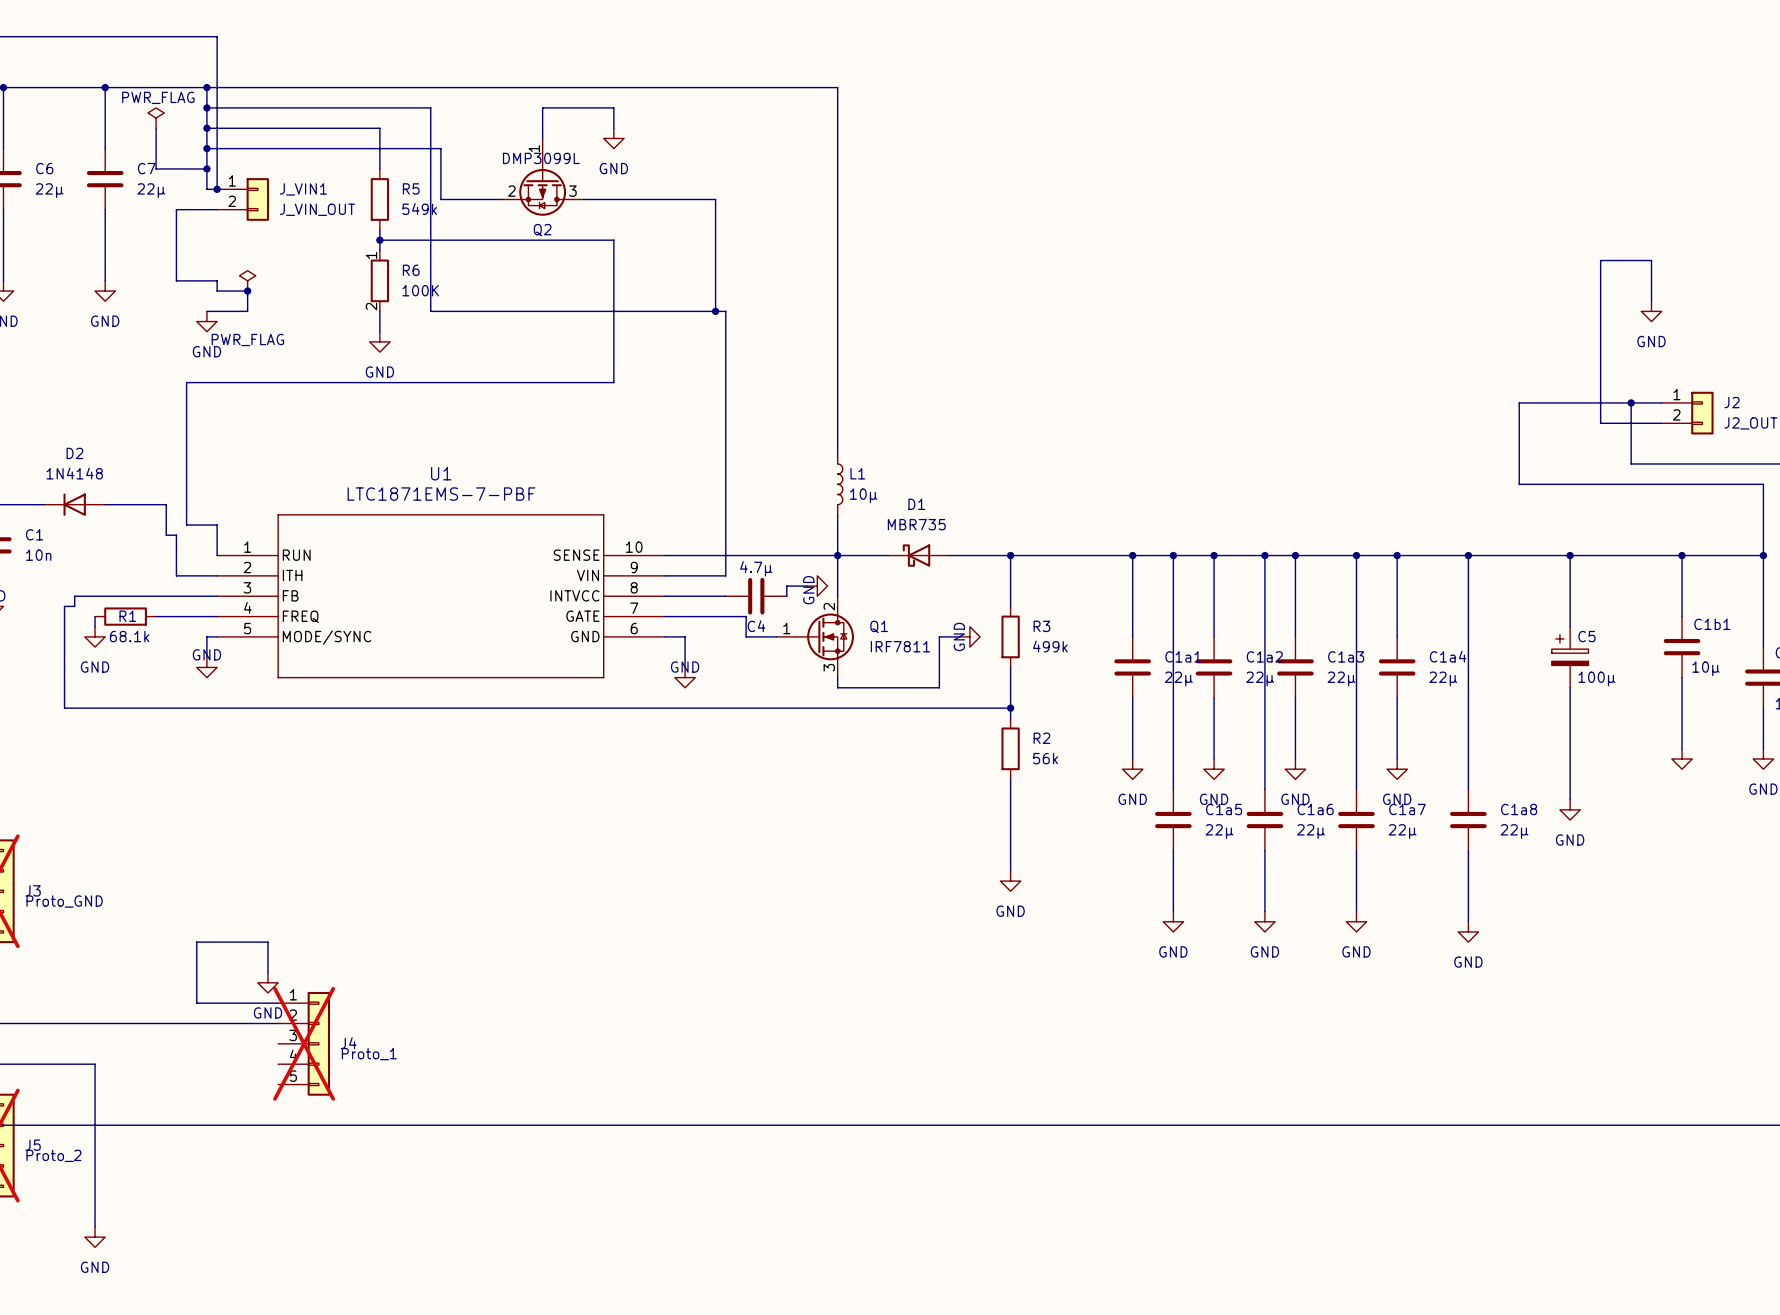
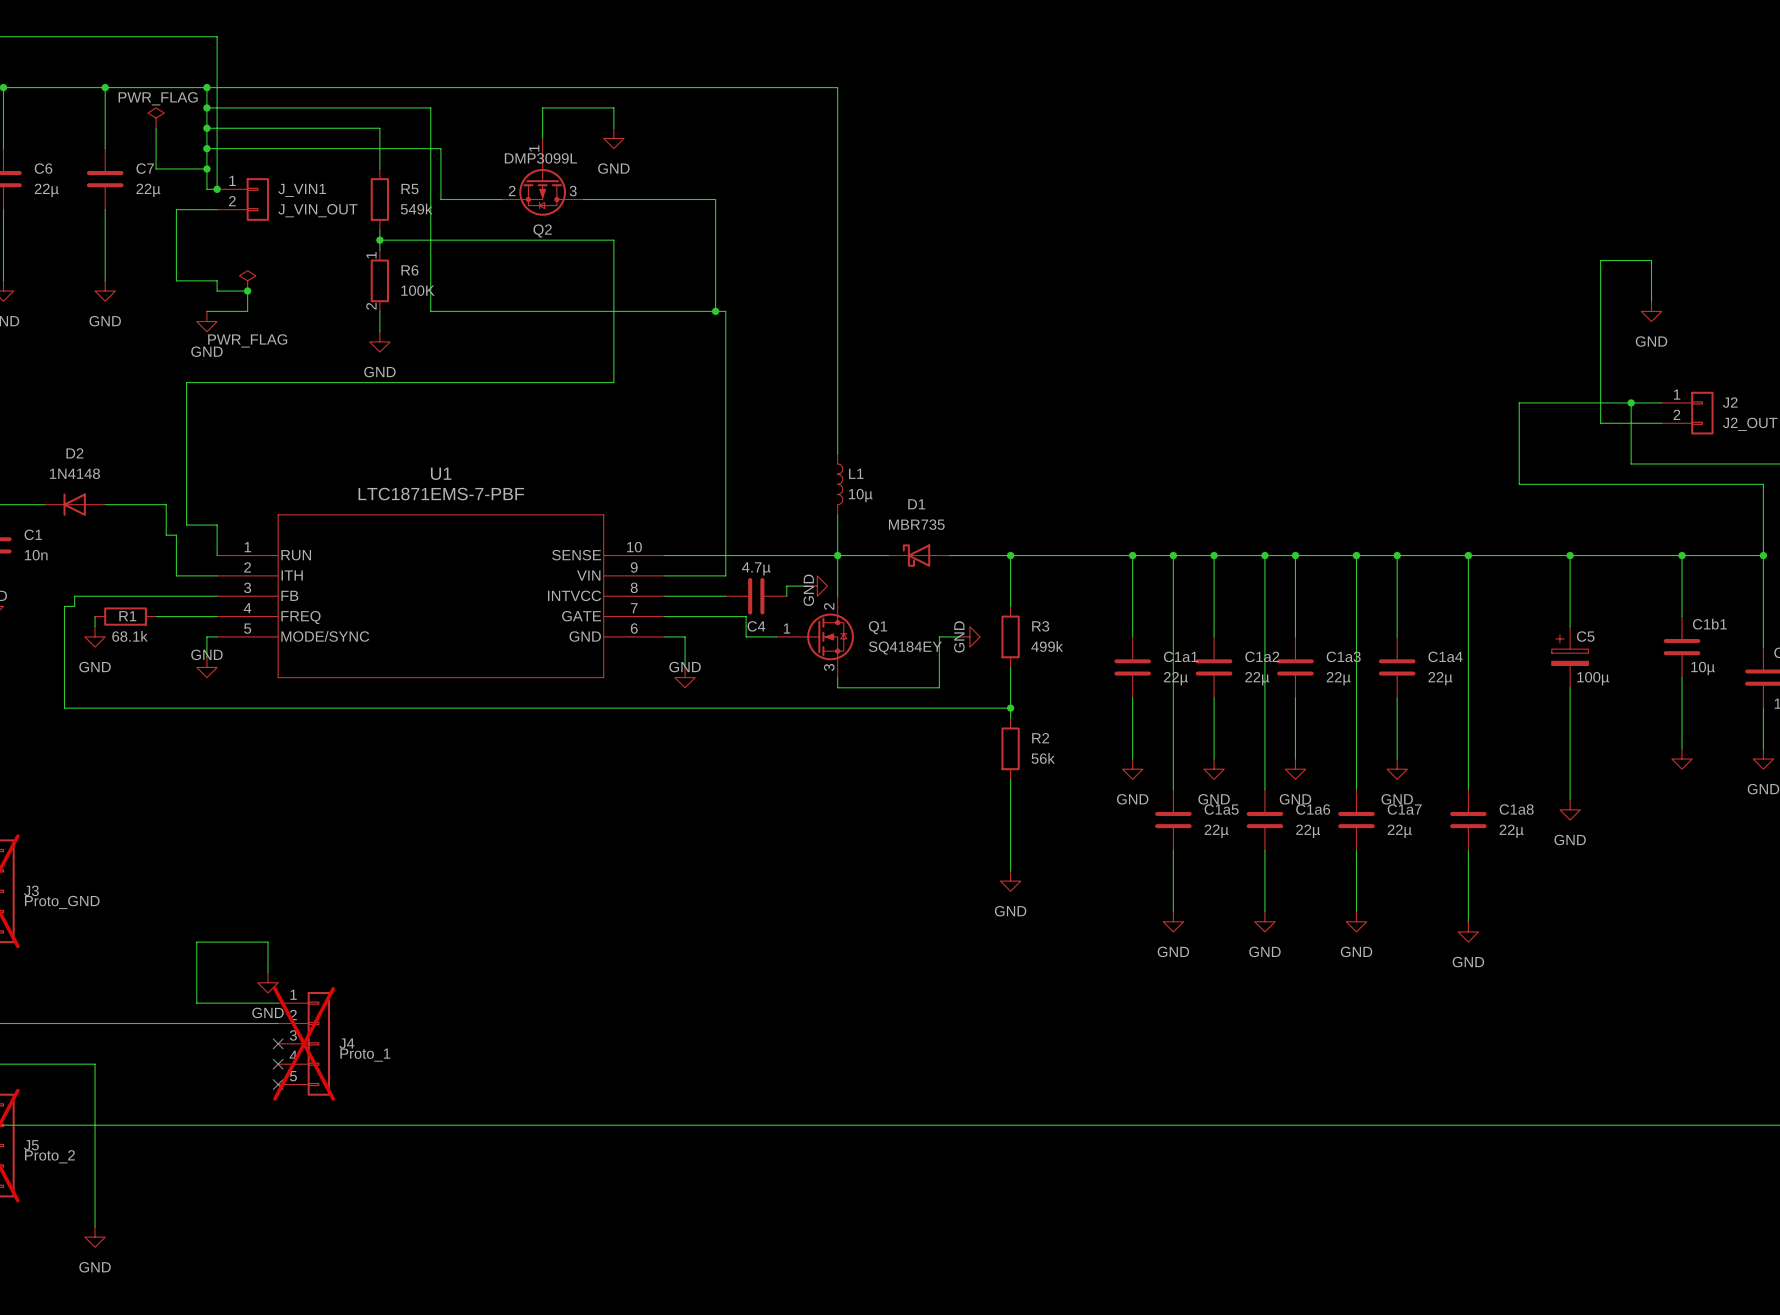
Q1 value: IRF7811 (900, 646) -> SQ4184EY (905, 648)
no-connect mark: none -> (278, 1043)
no-connect mark: none -> (278, 1064)
no-connect mark: none -> (278, 1084)

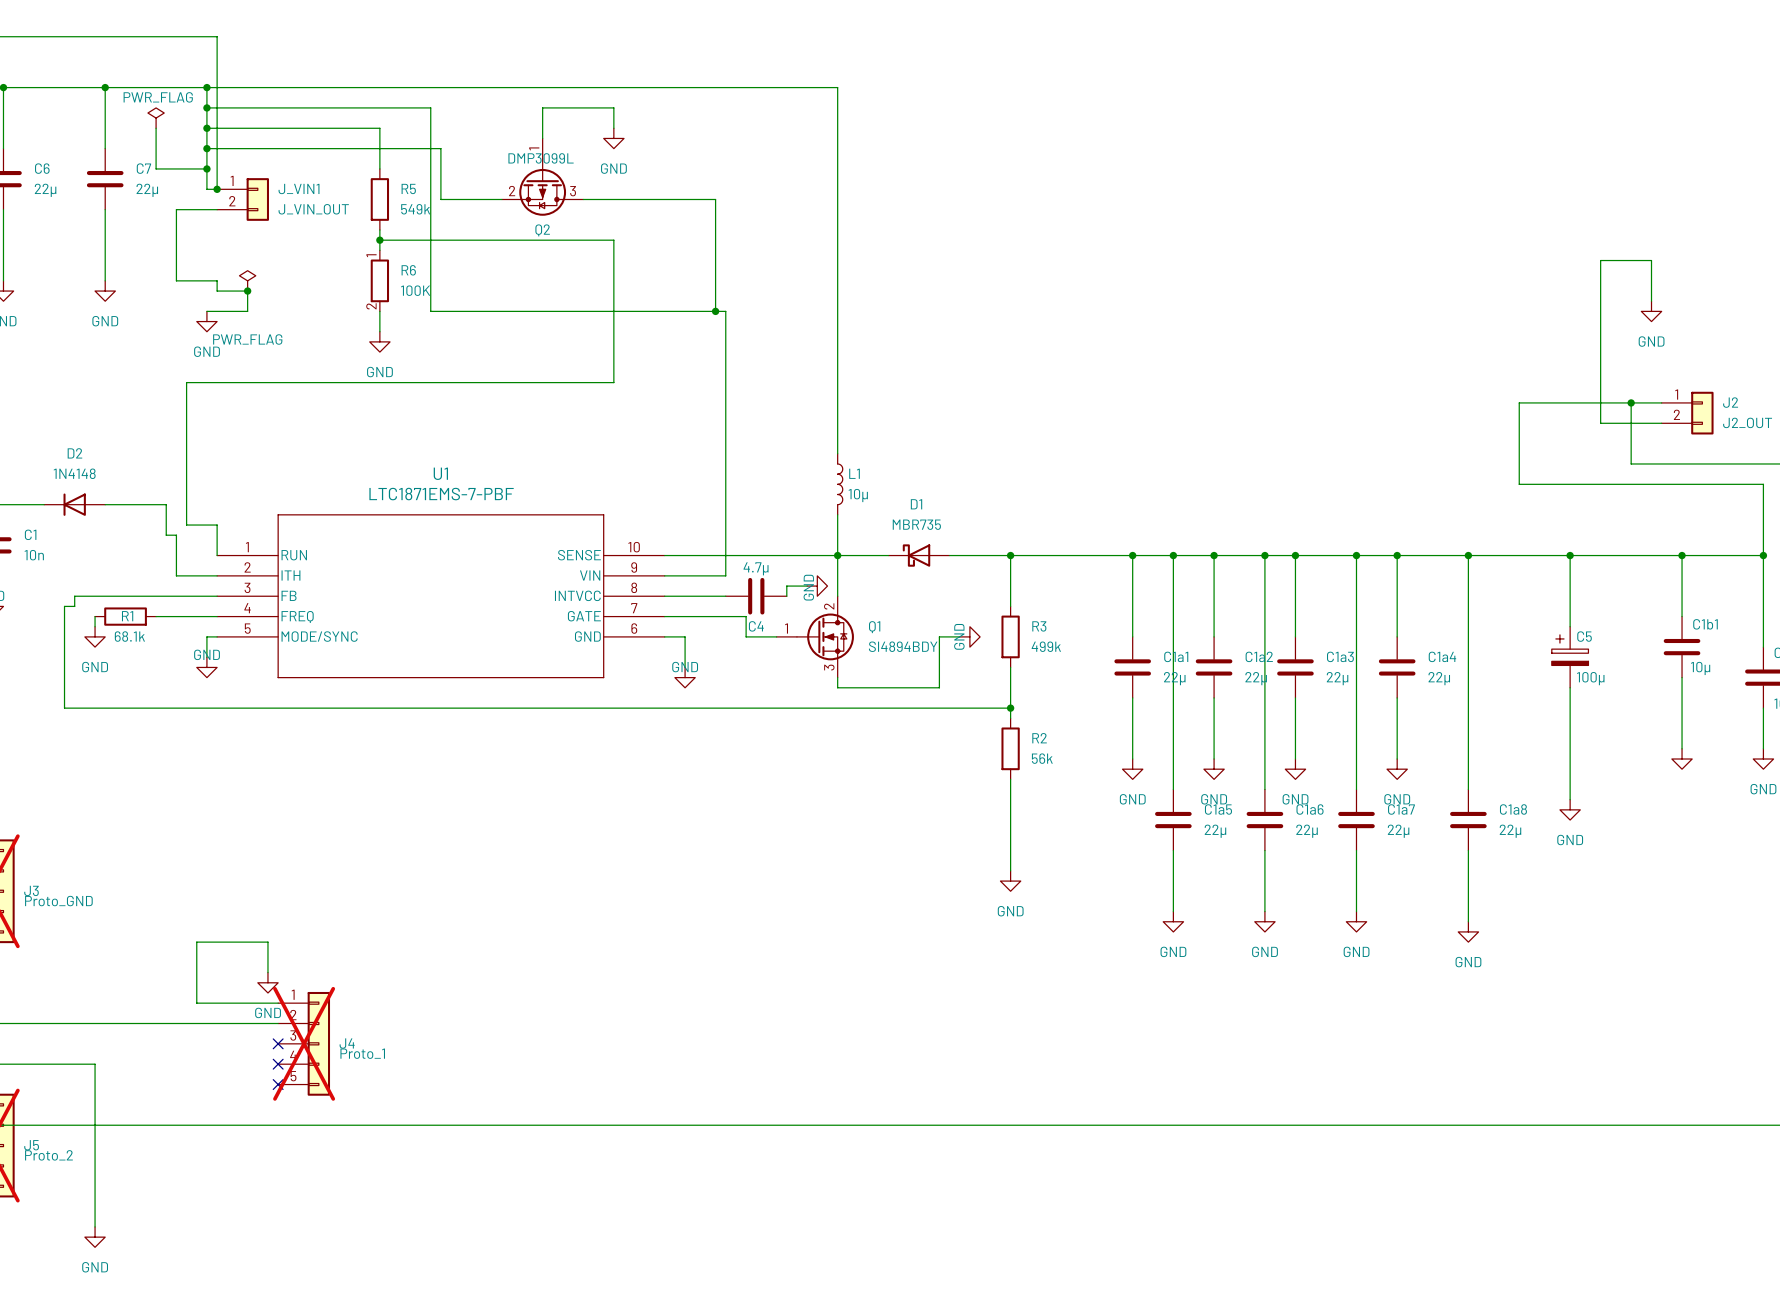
Q1 value: SQ4184EY (905, 648) -> SI4894BDY (903, 646)

